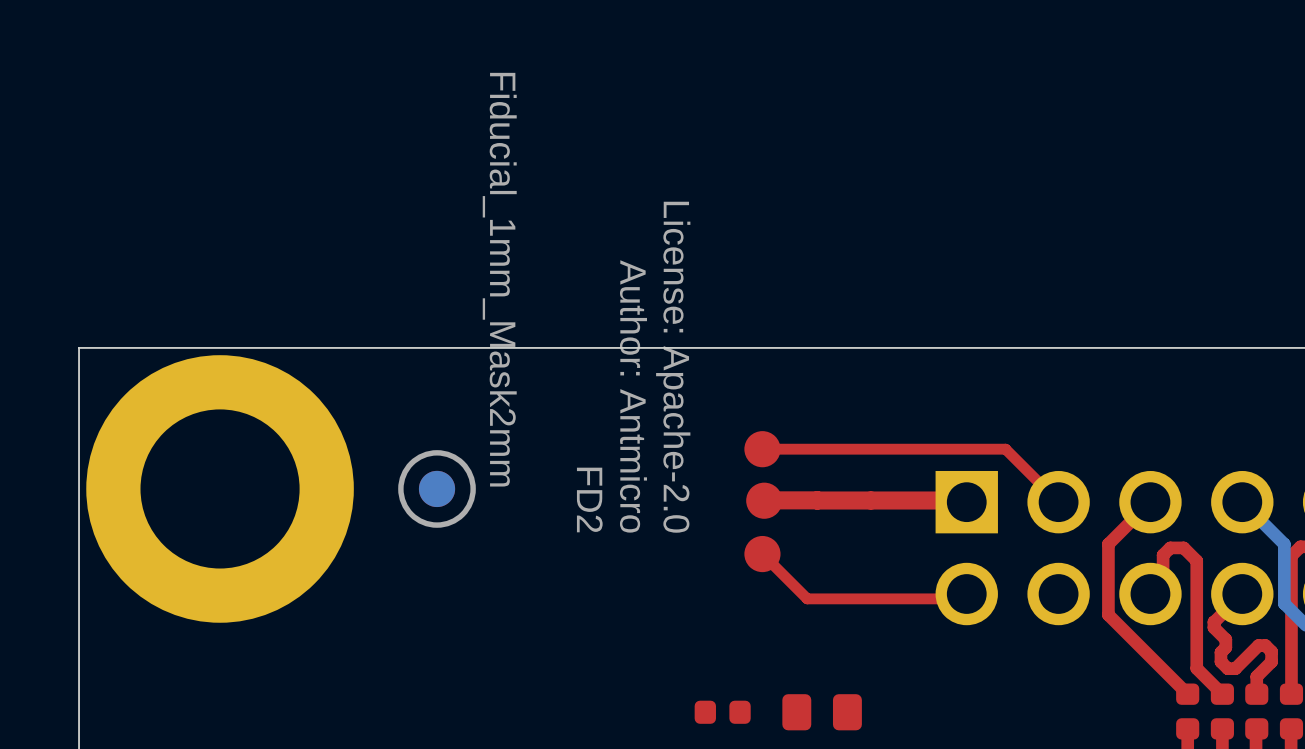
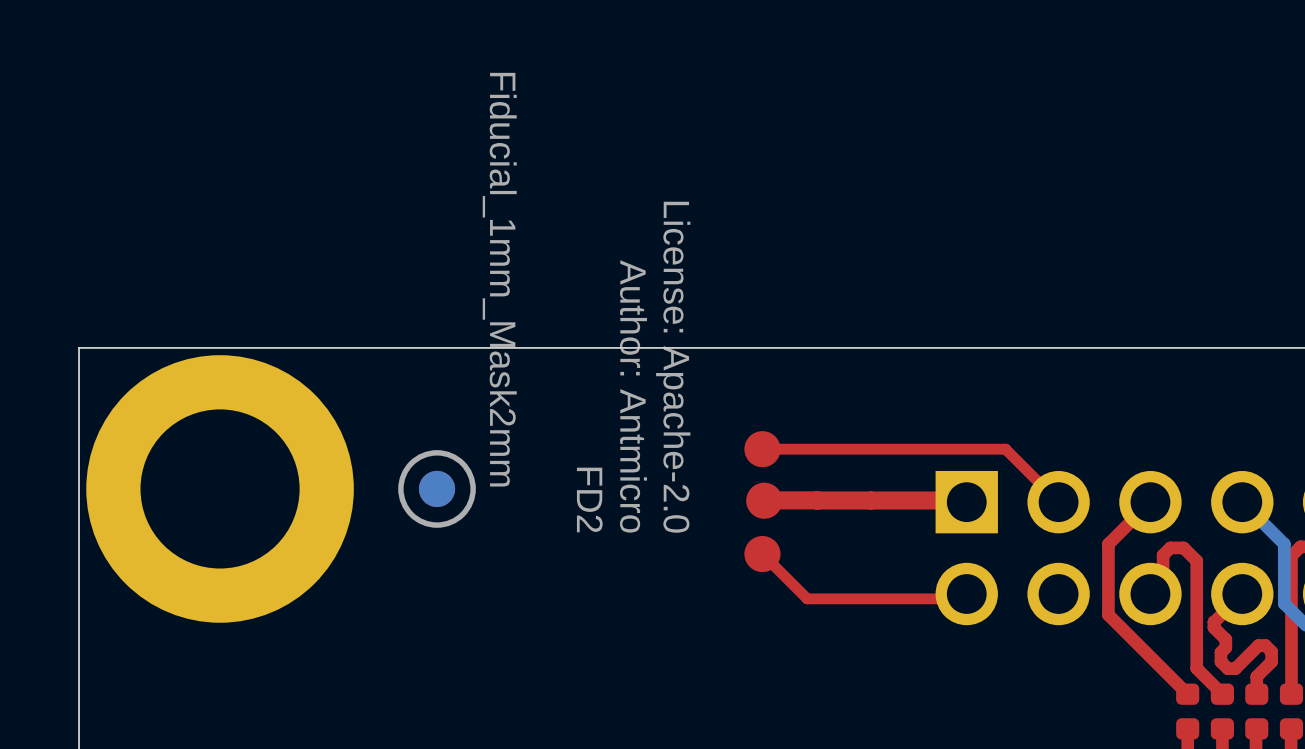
part: (722, 712) -> none
part: (822, 712) -> none

